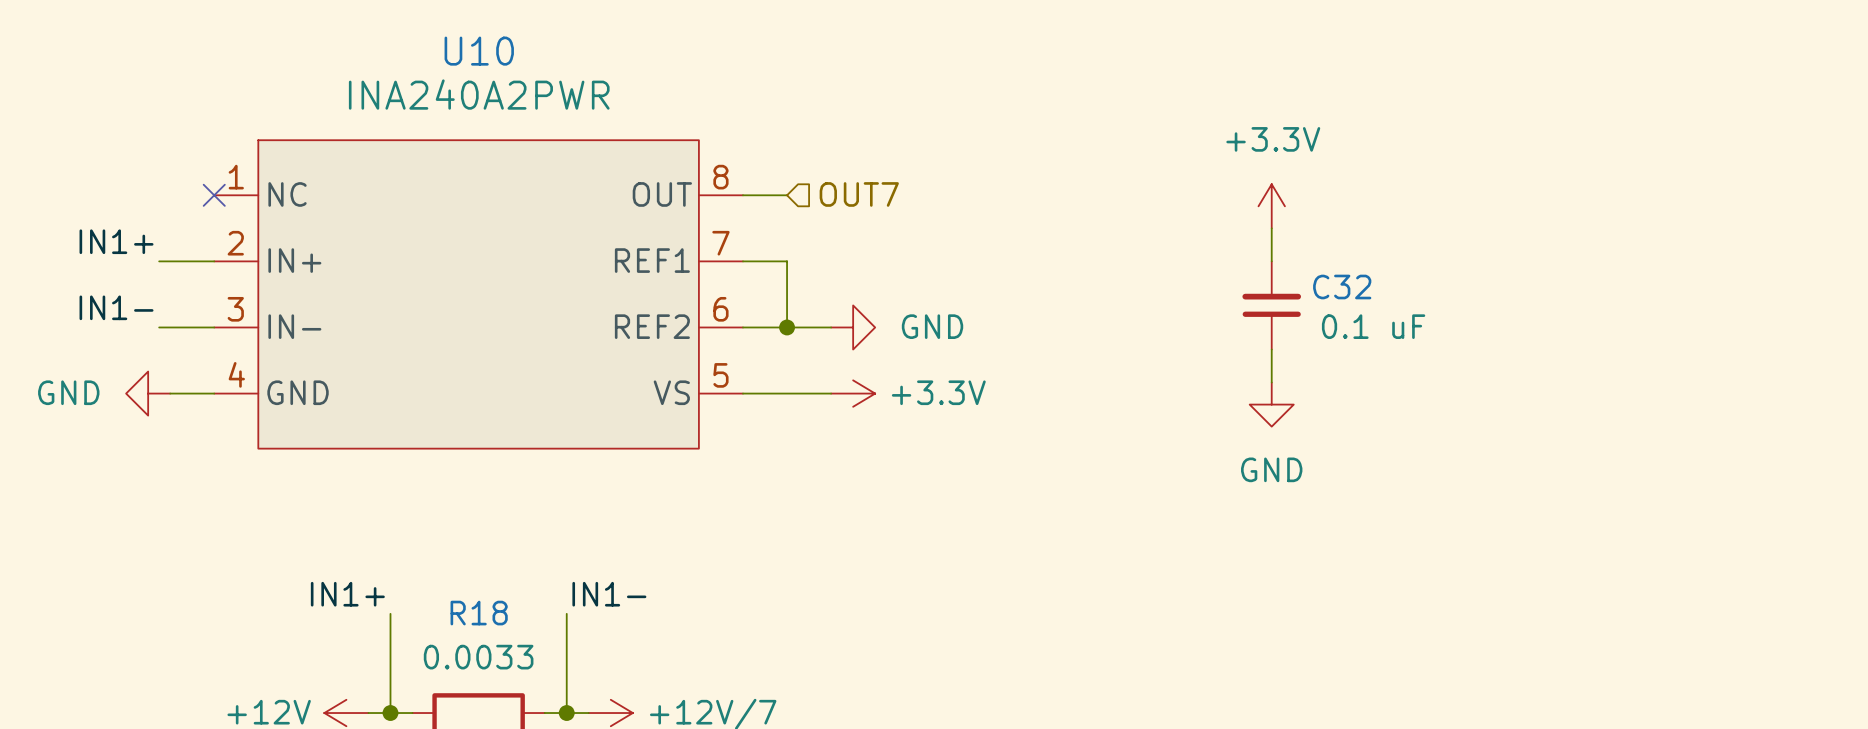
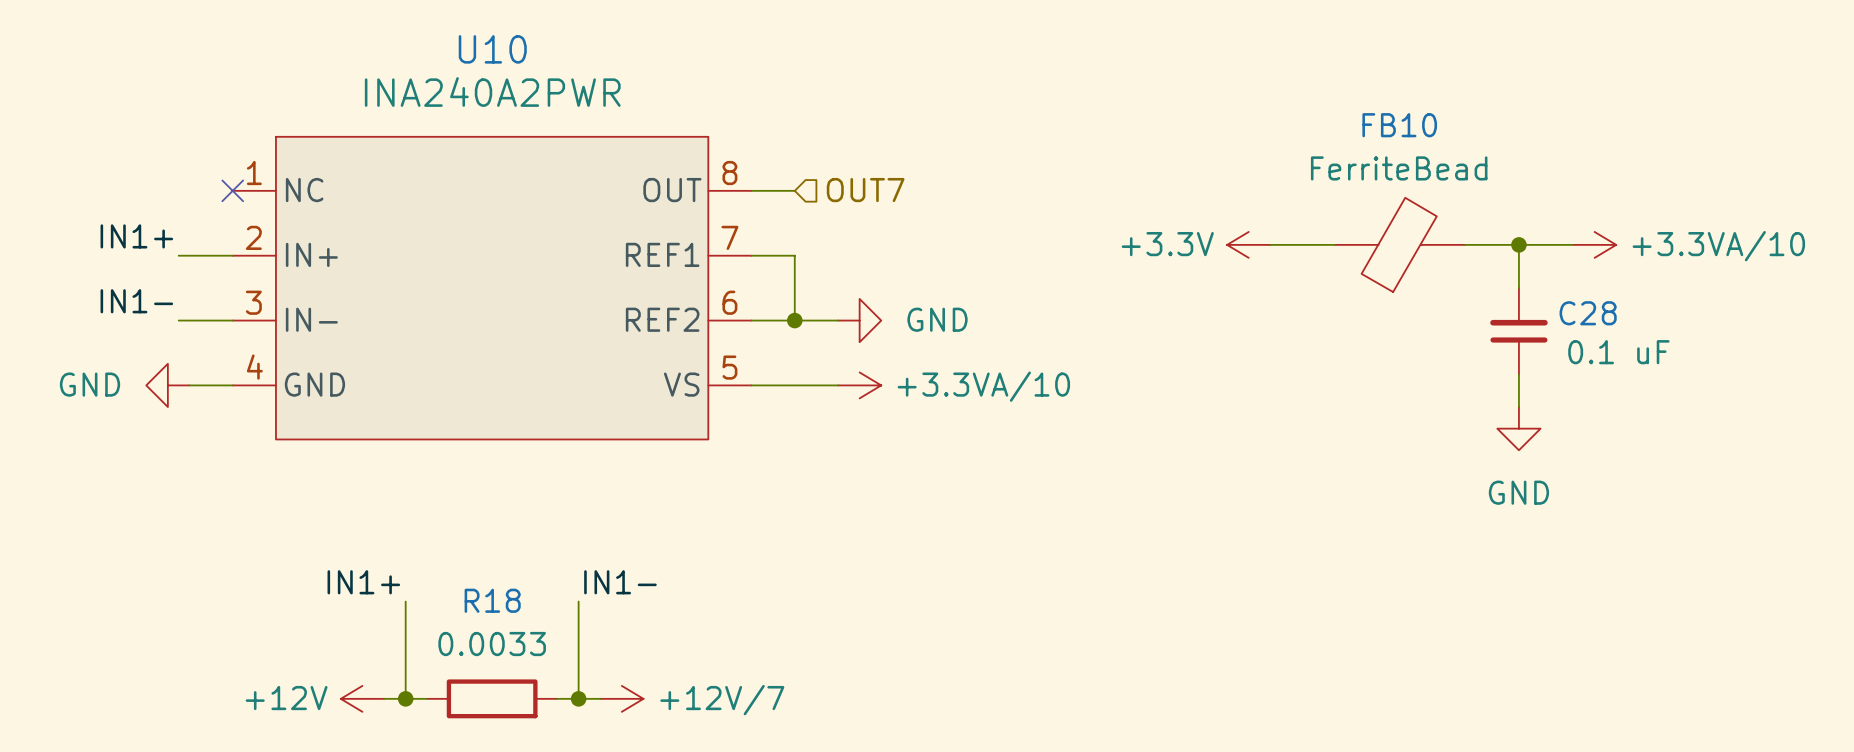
power symbol rotation: 0° (1271, 206) -> 90° counterclockwise (1248, 244)
power symbol position: +3.3V (1271, 206) -> +3.3V (1248, 244)
wire: (1271, 228) (1271, 261) -> none
wire: none -> (1270, 244) (1335, 244)
FB10: none -> FerriteBead (1400, 244)
wire: none -> (1464, 244) (1572, 244)
wire: none -> (1518, 244) (1518, 288)
junction: none -> (1518, 244)
power symbol: none -> +3.3VA/10 (1594, 244)
C32: 0.1 uF (1271, 305) -> none
C28: none -> 0.1 uF (1518, 331)
wire: (1271, 349) (1271, 382) -> (1518, 374) (1518, 407)
power symbol: +3.3V (853, 393) -> +3.3VA/10 (859, 385)
power symbol position: GND (1271, 404) -> GND (1518, 428)

